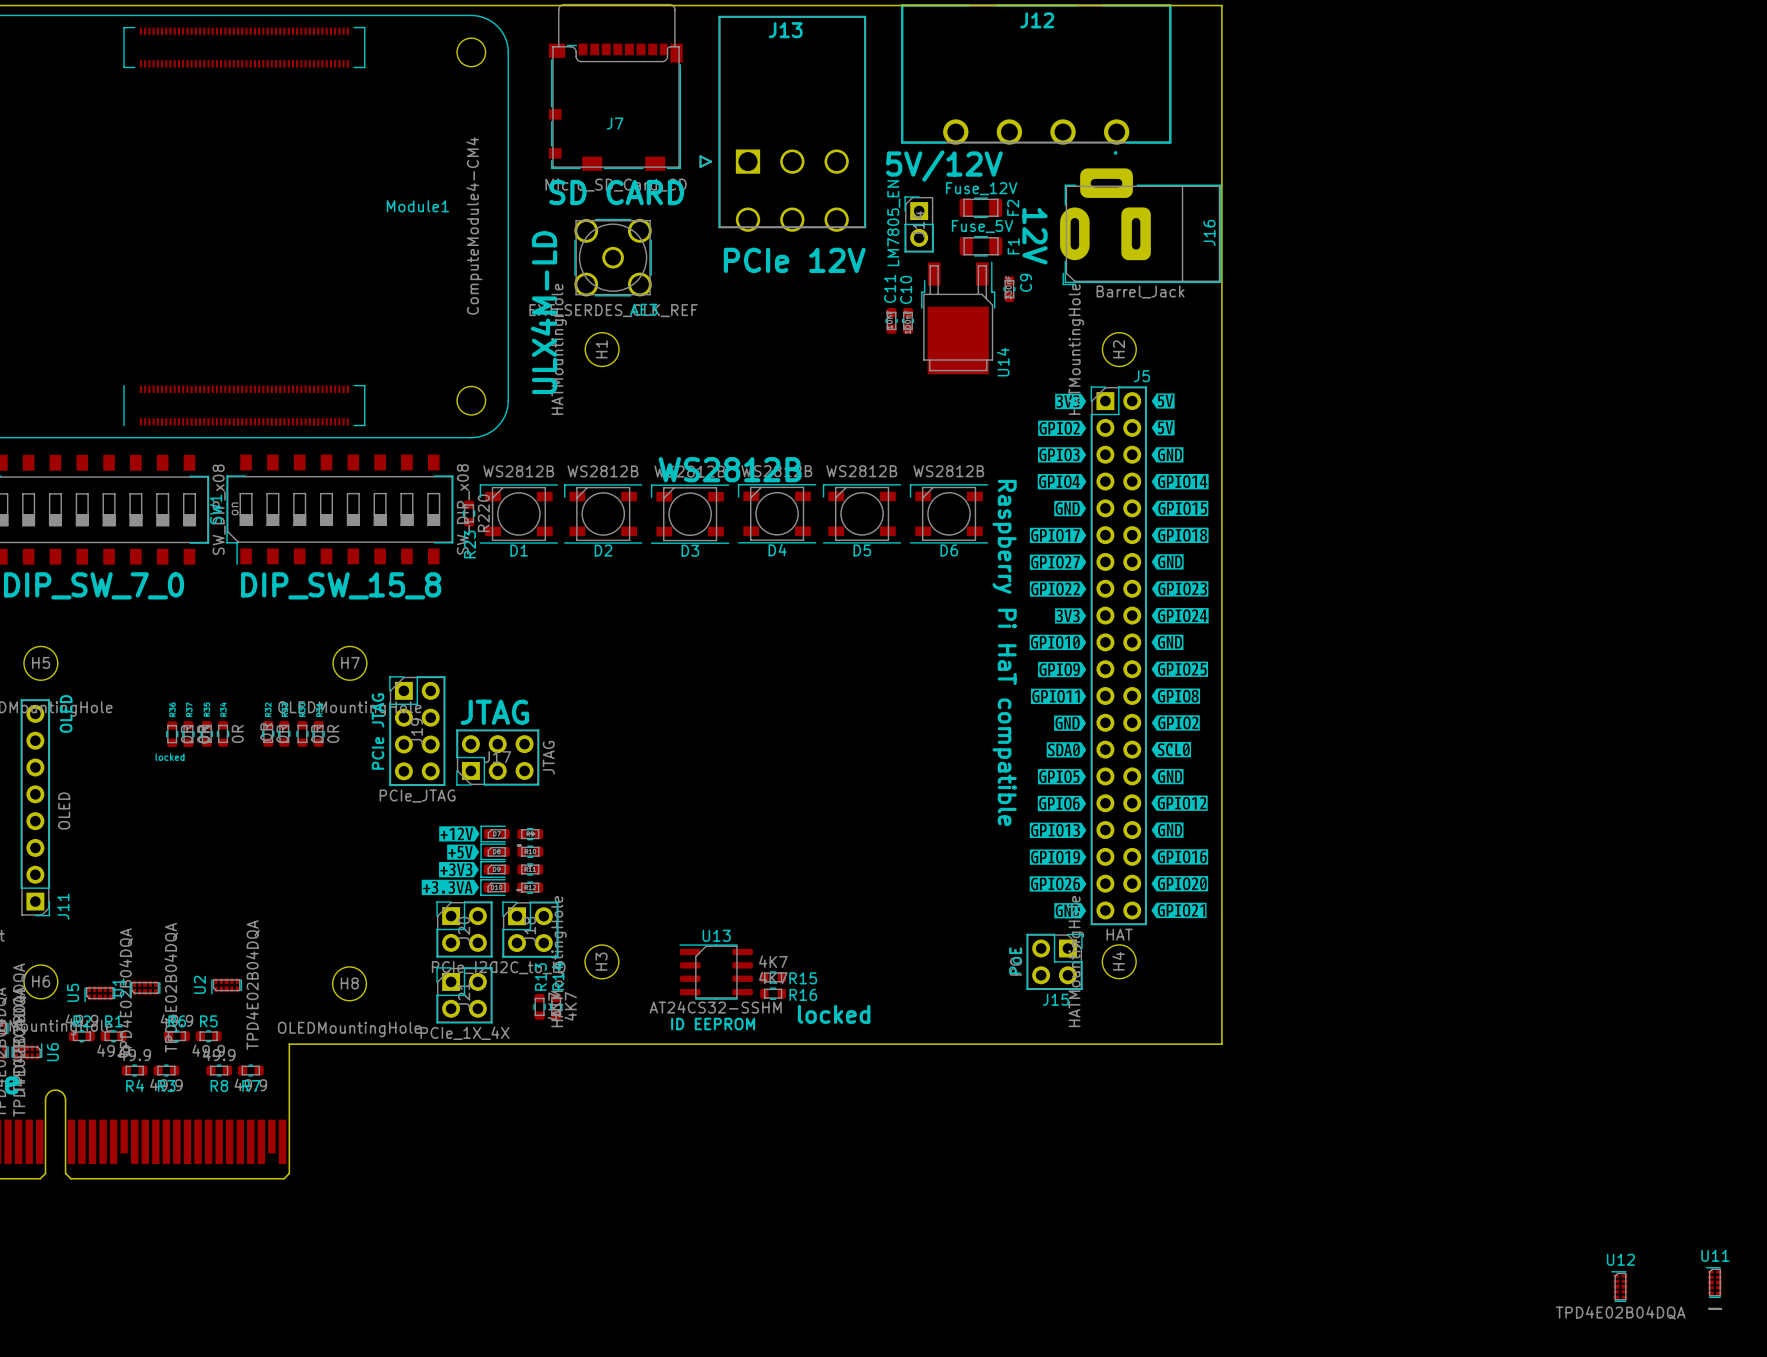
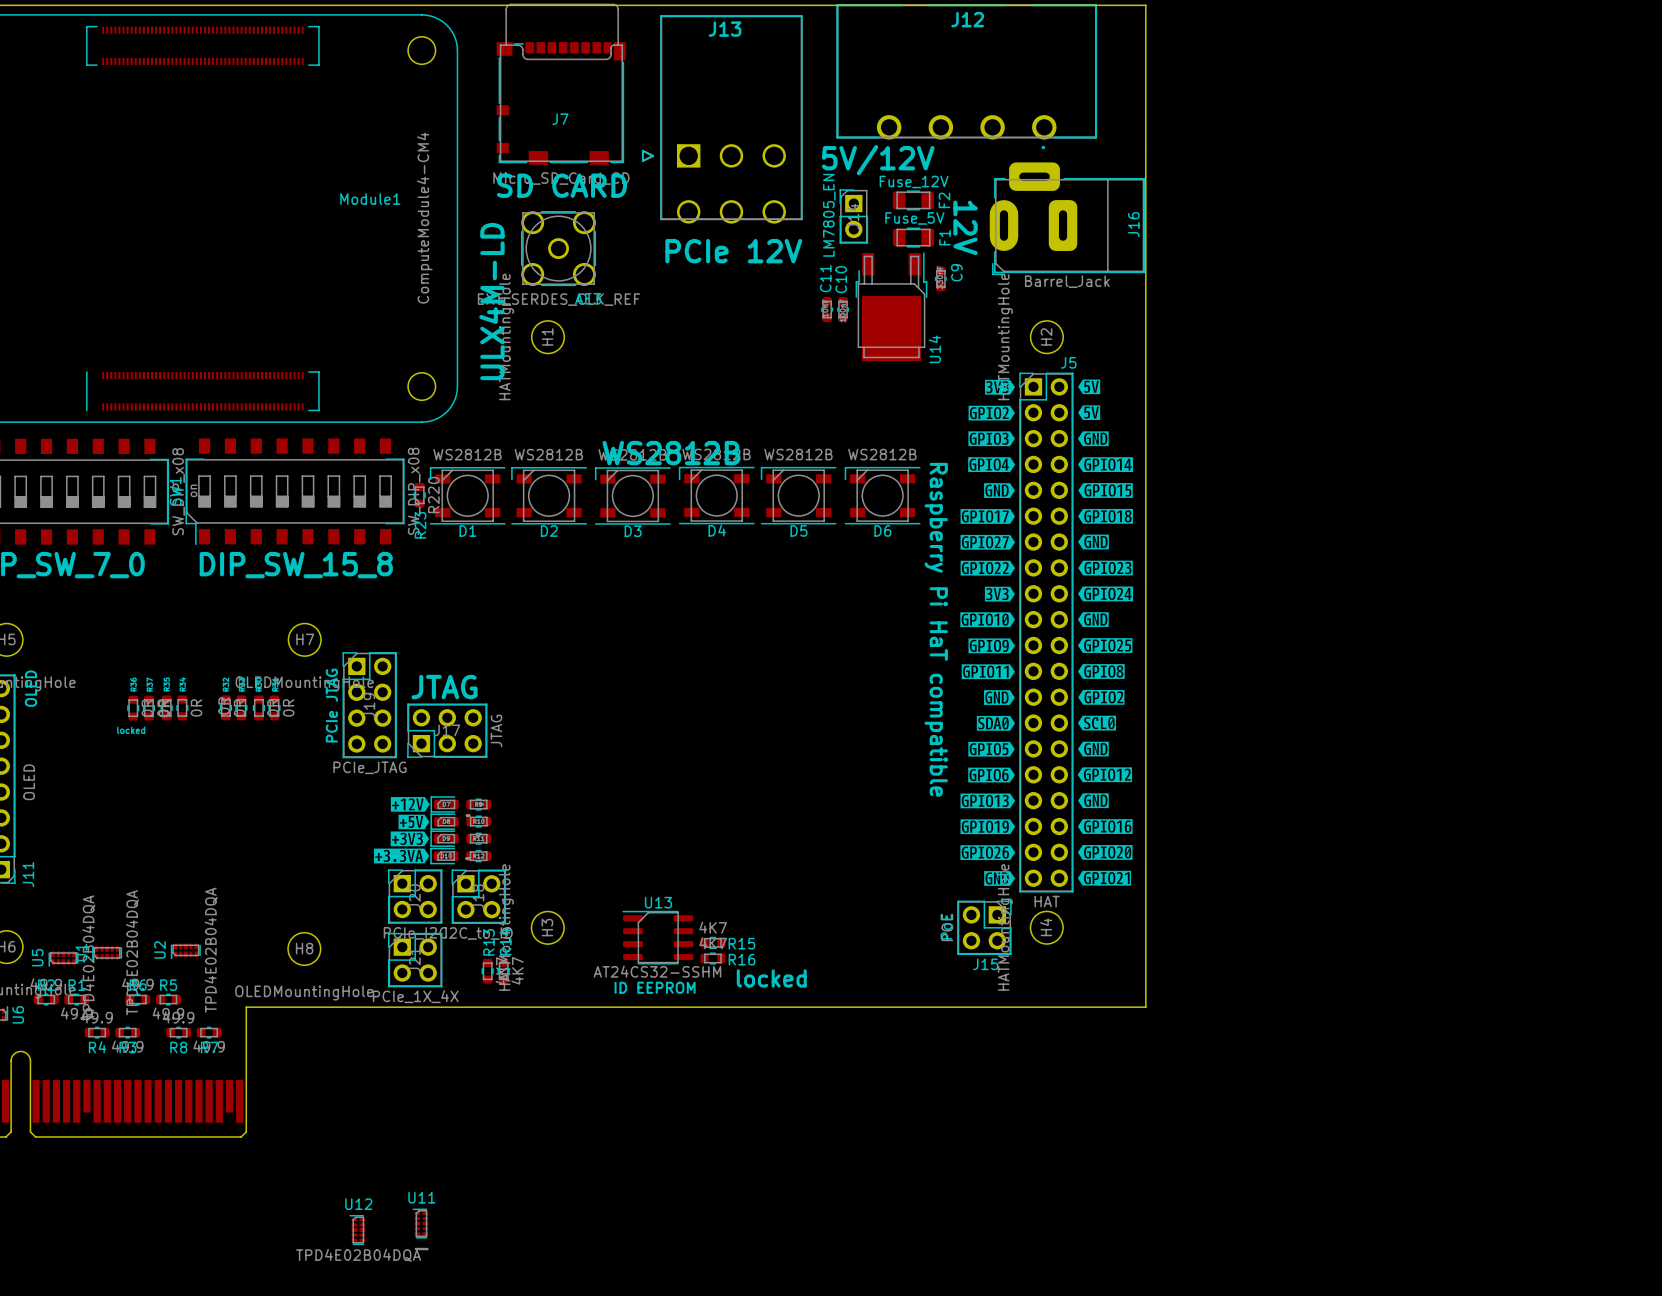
U11 position: (1713, 1282) -> (420, 1223)
U12 position: (1619, 1286) -> (357, 1230)

